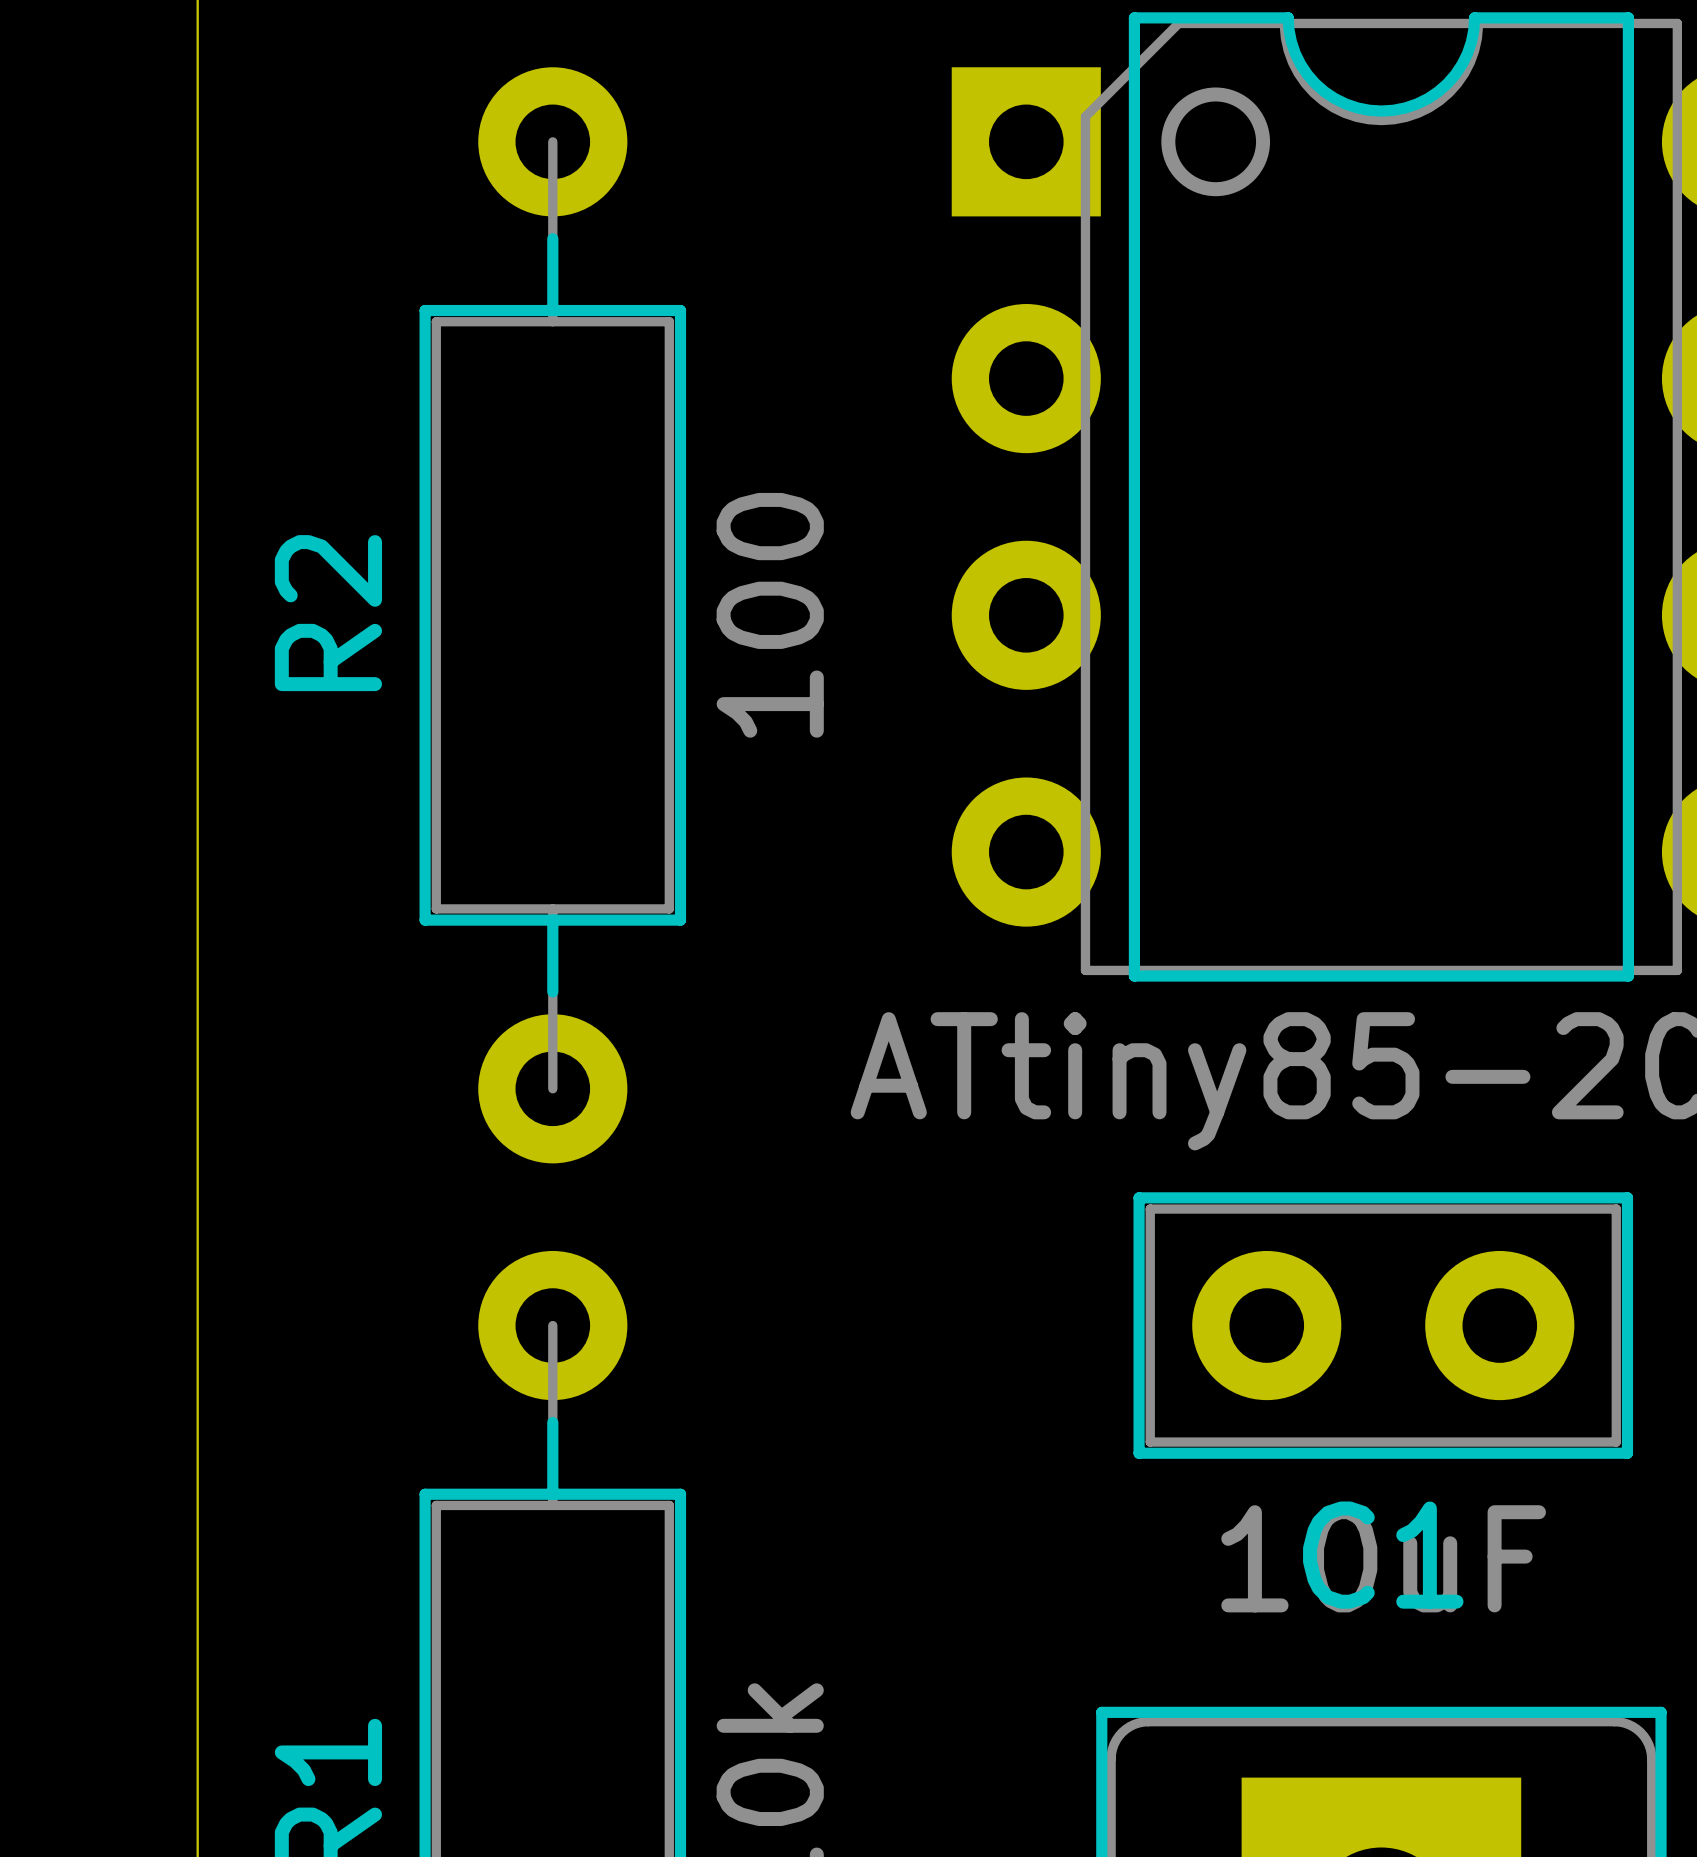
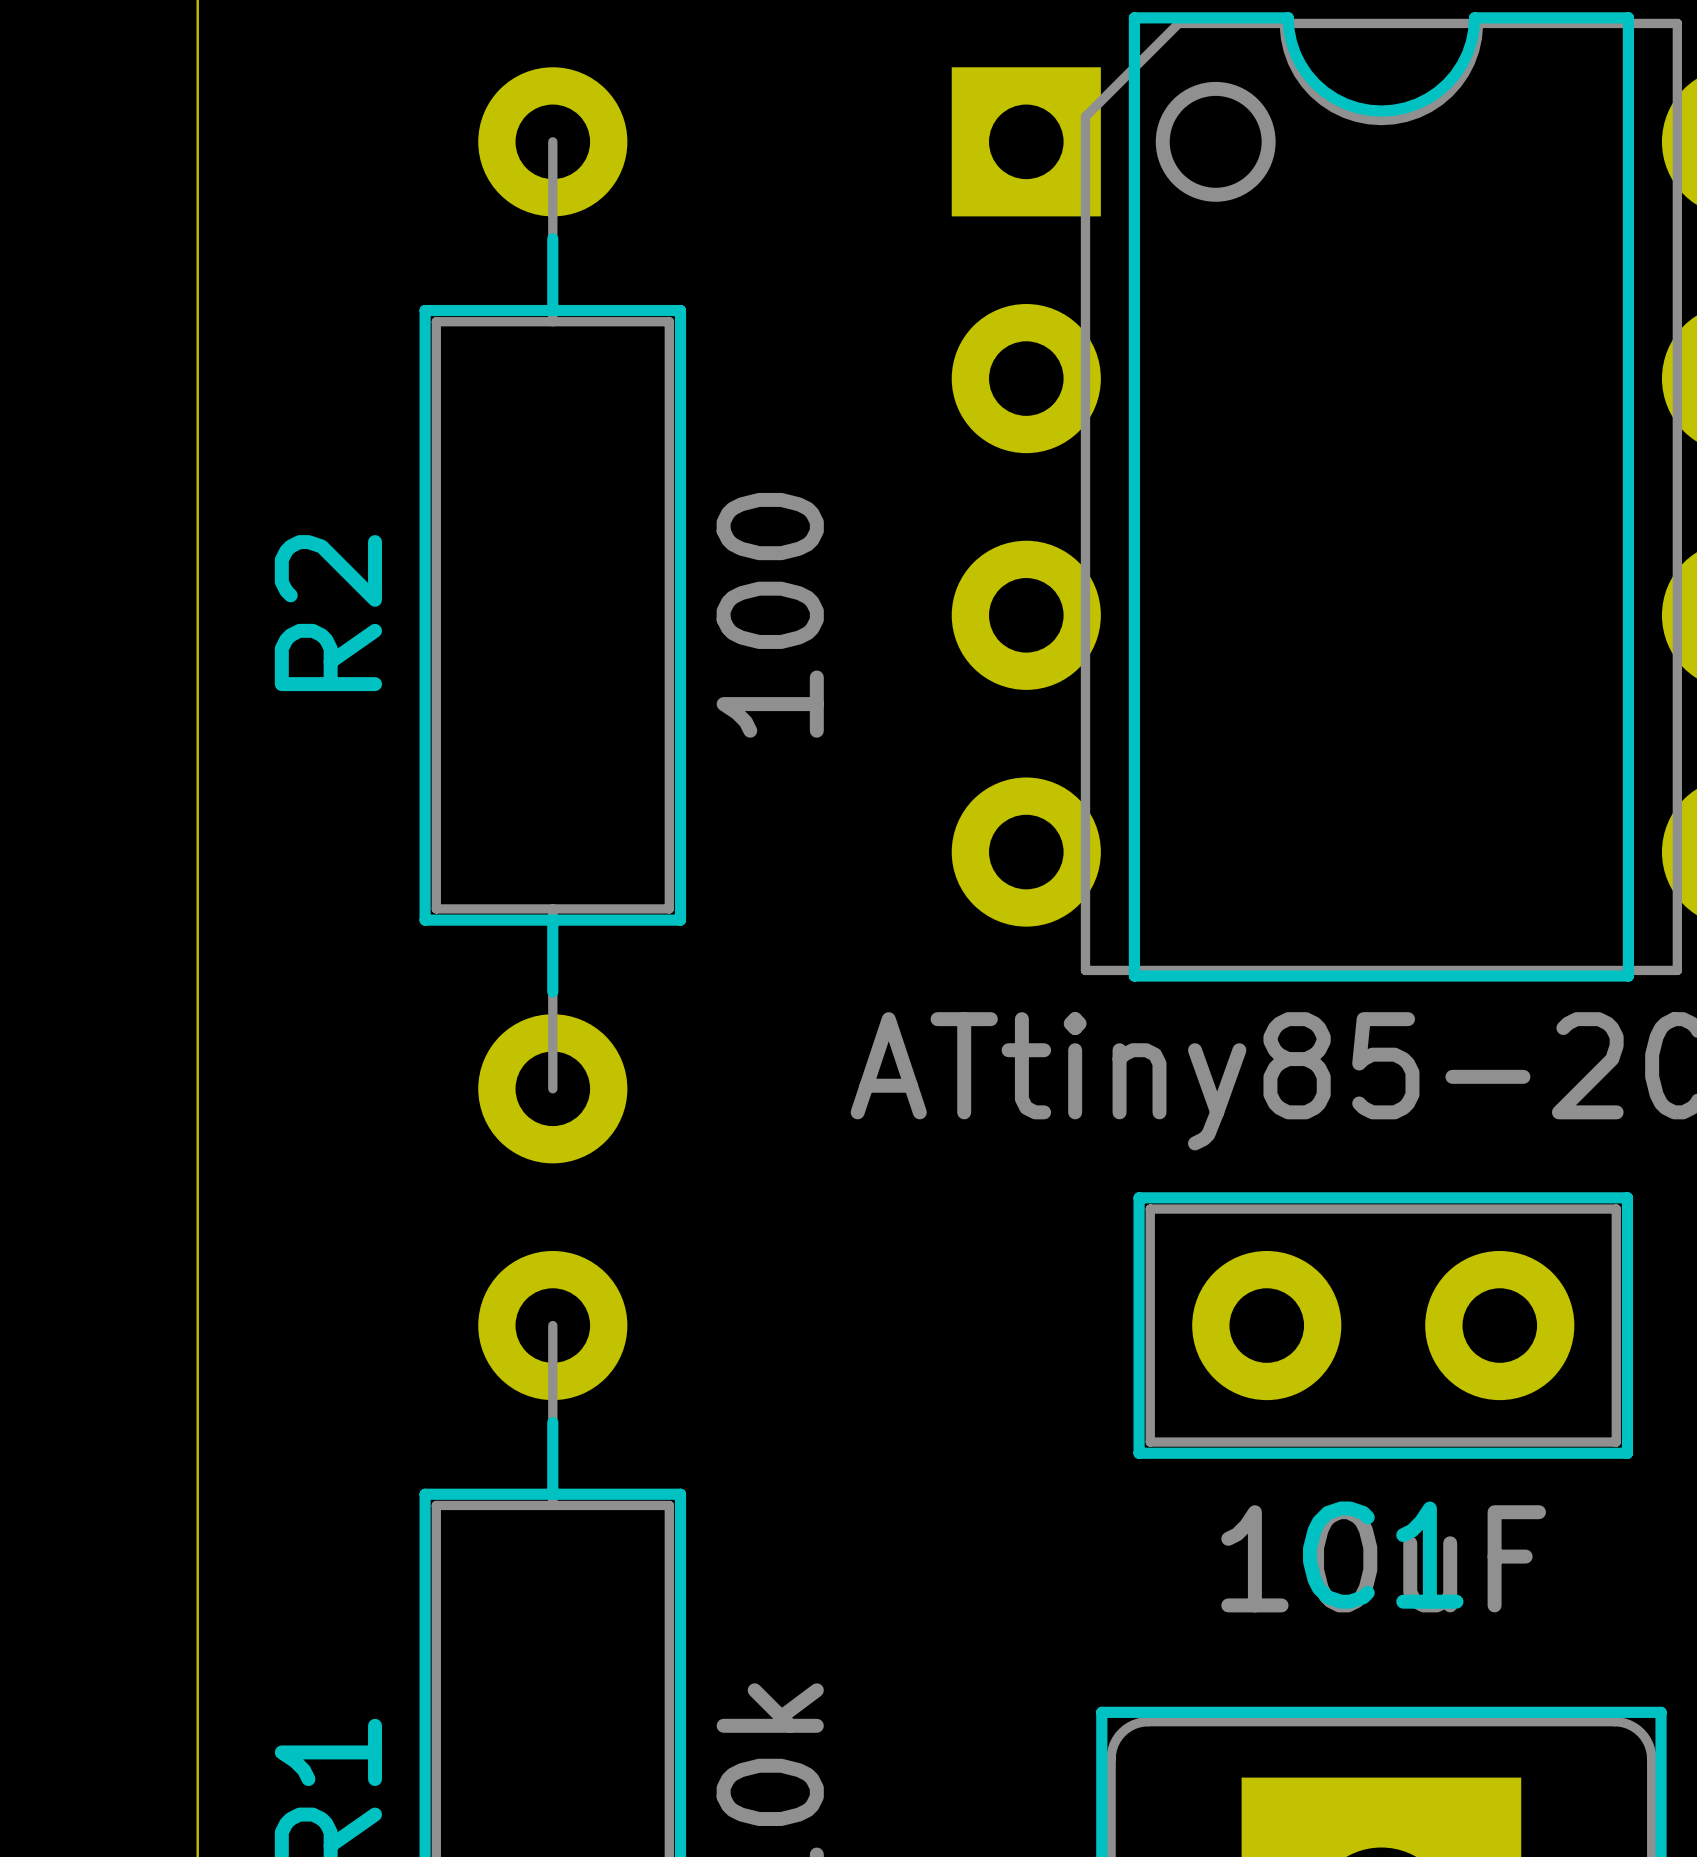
drawing shape: [1161, 87, 1271, 197] -> [1155, 81, 1276, 202]

